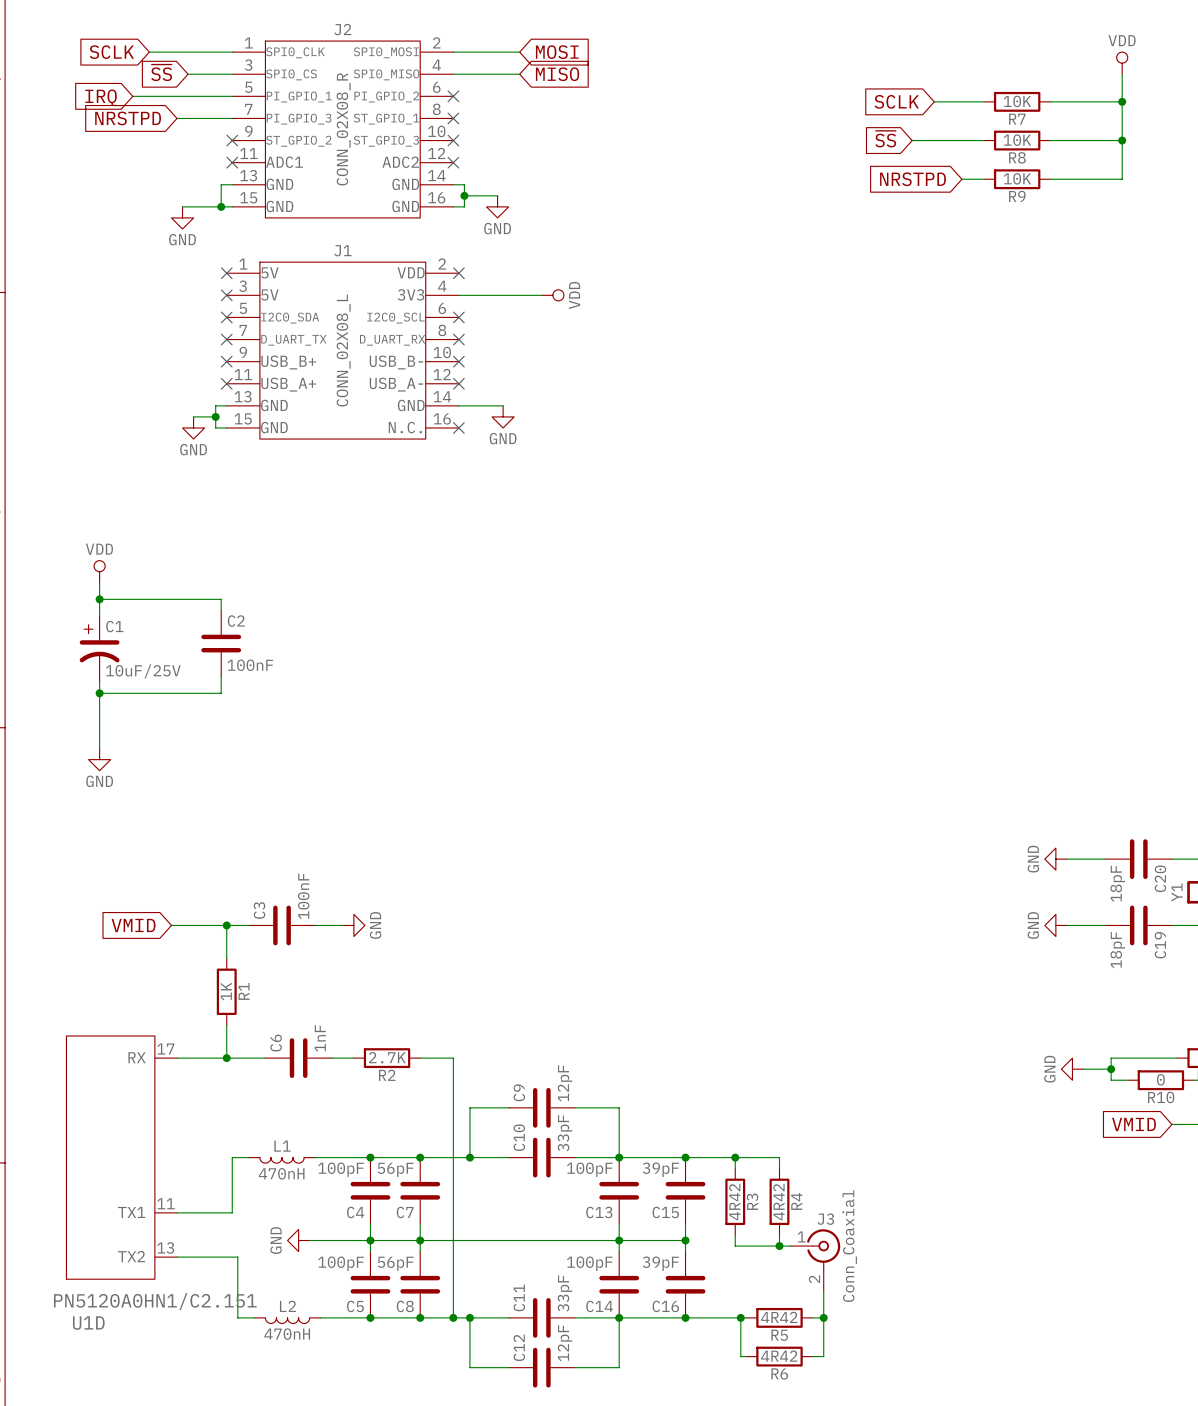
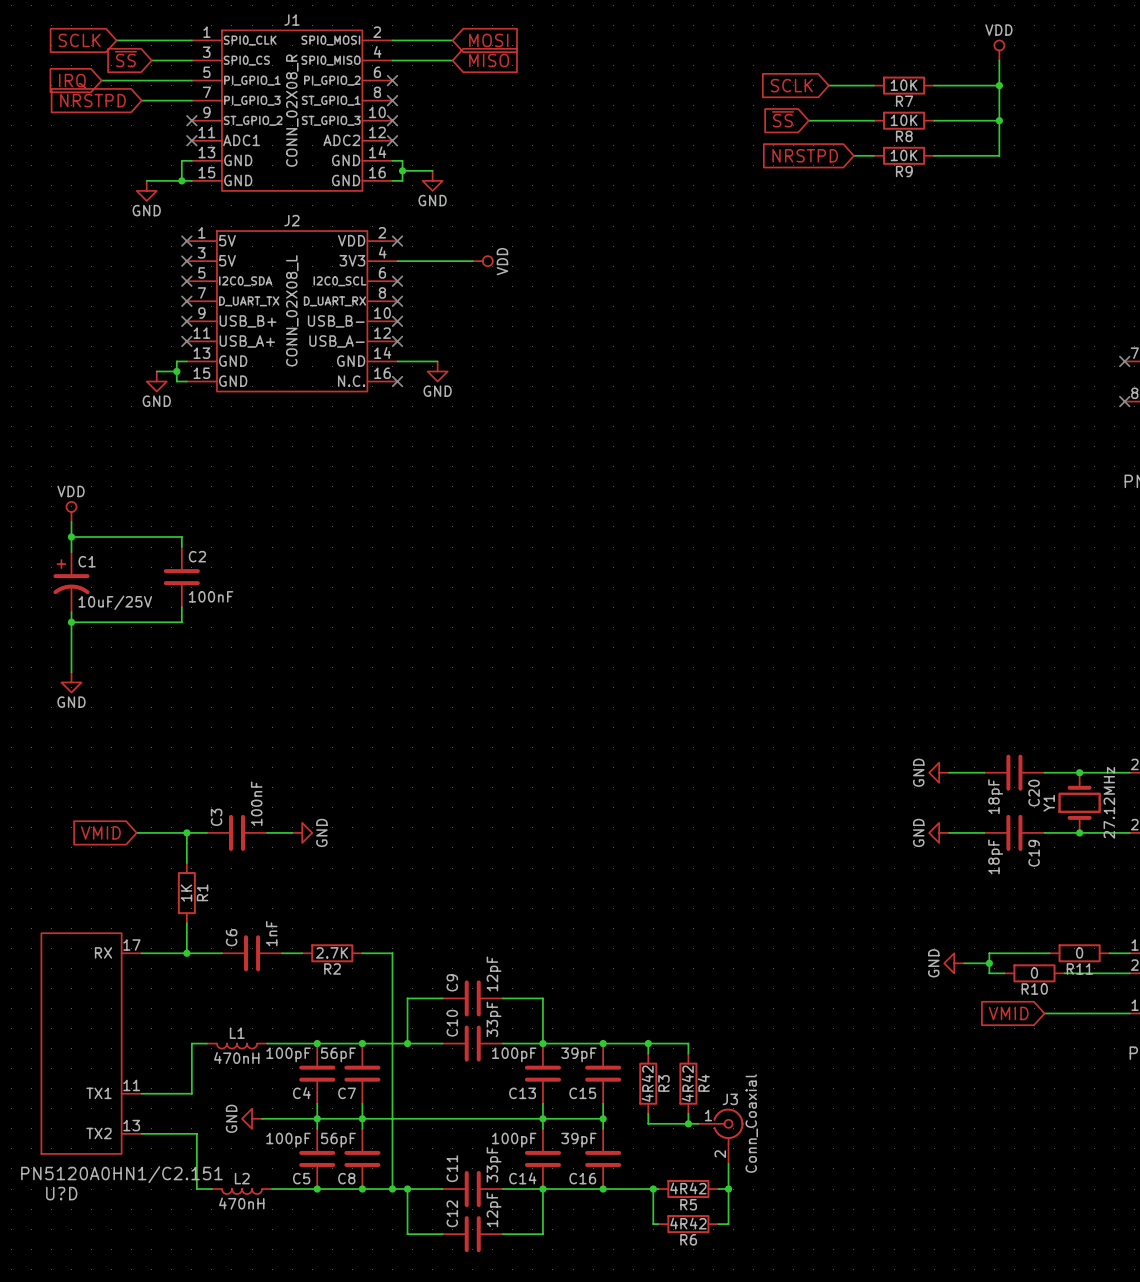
J2 name: J2 (342, 29) -> J1 (291, 20)
J1 name: J1 (343, 250) -> J2 (291, 220)
U1D name: U1D (88, 1323) -> U?D (61, 1193)

